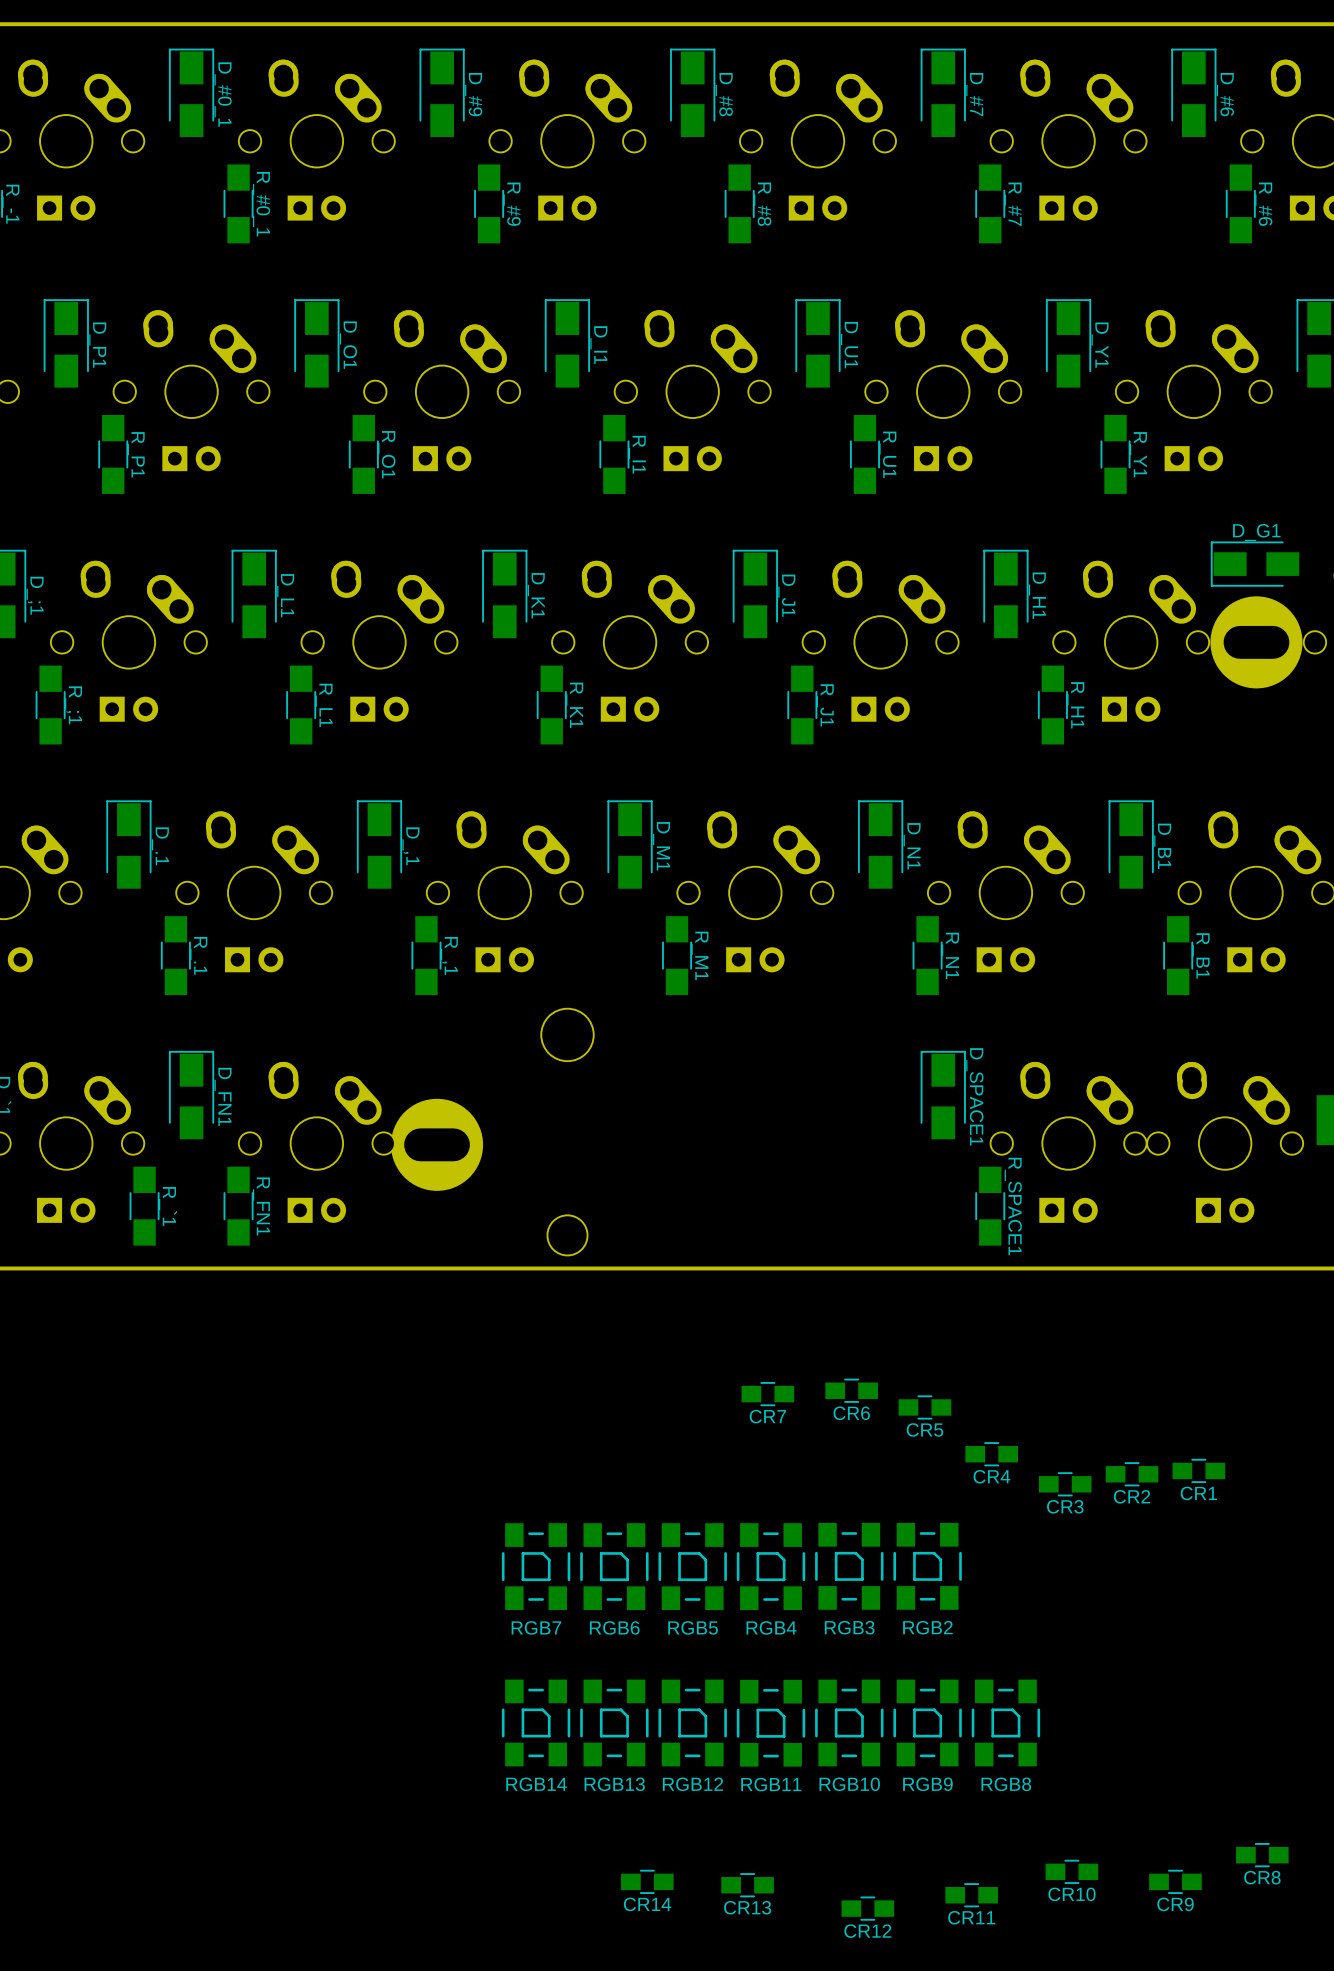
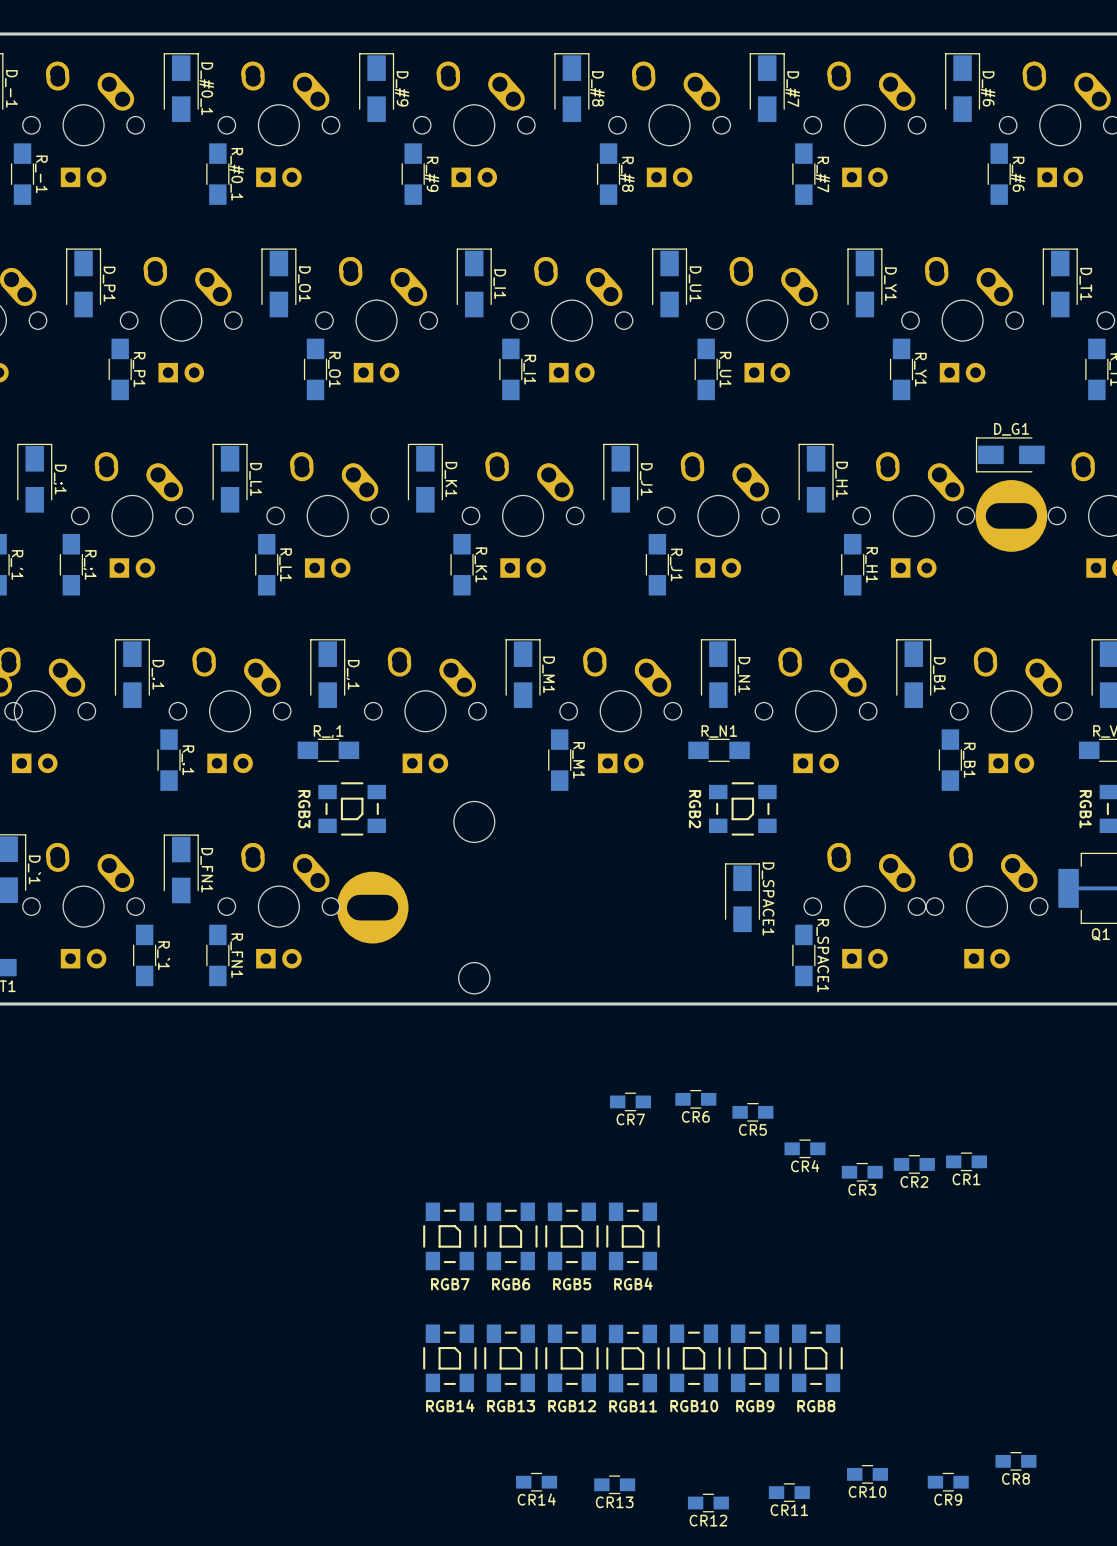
R_,1 rotation: 0° (426, 955) -> 90° clockwise (328, 750)
R_,1 position: (426, 955) -> (328, 750)
R_,1 name position: R_,1 (449, 955) -> R_,1 (328, 731)
R_N1 rotation: 0° (927, 955) -> 90° clockwise (719, 750)
R_N1 position: (927, 955) -> (719, 750)
R_N1 name position: R_N1 (950, 955) -> R_N1 (719, 731)
D_SPACE1 position: (943, 1095) -> (742, 897)
RGB3 rotation: 0° (849, 1566) -> 90° clockwise (352, 808)
RGB3 position: (849, 1566) -> (352, 808)
RGB2 rotation: 0° (927, 1566) -> 90° clockwise (742, 808)
RGB2 position: (927, 1566) -> (742, 808)

